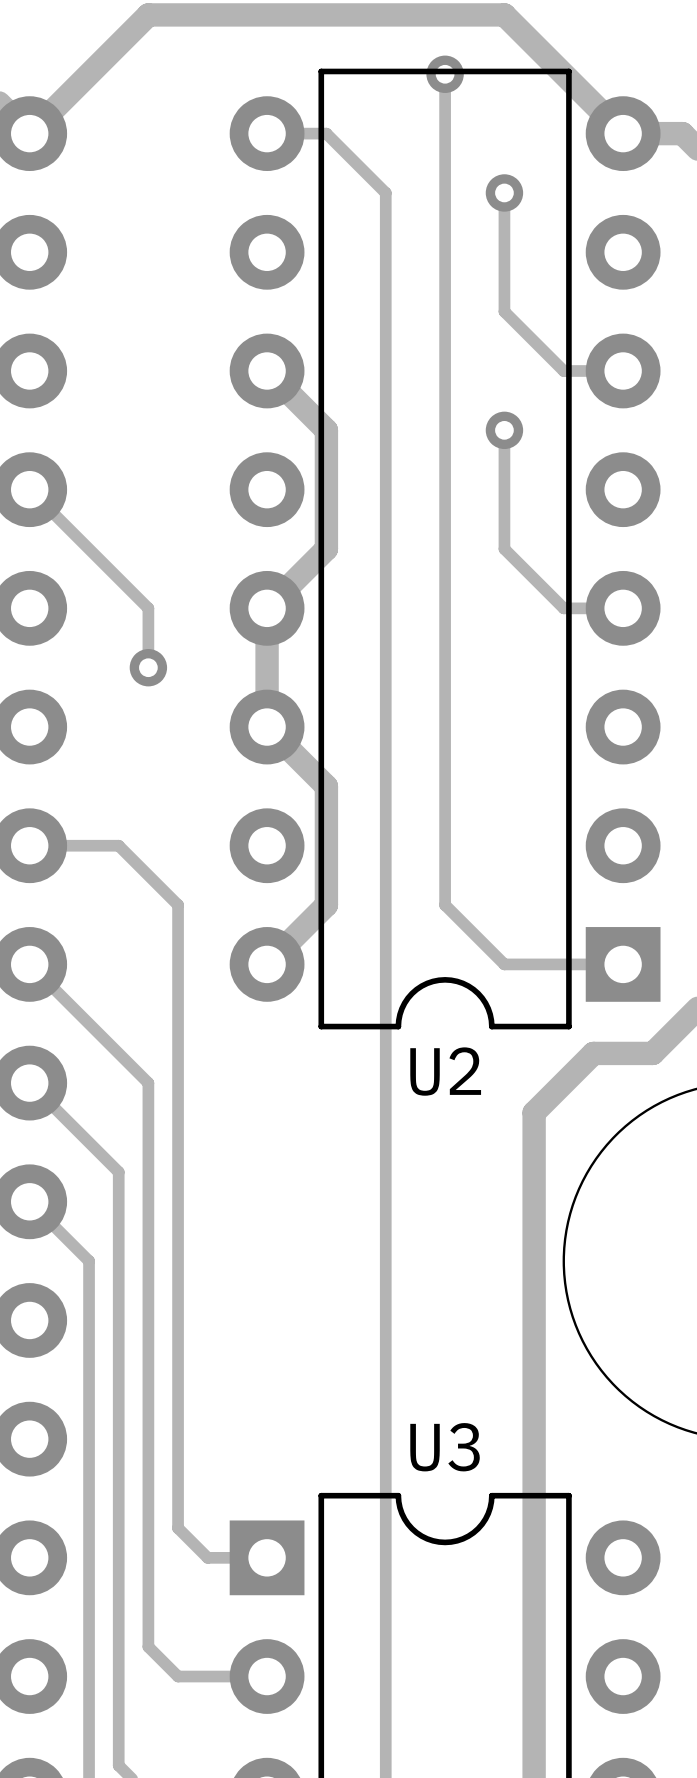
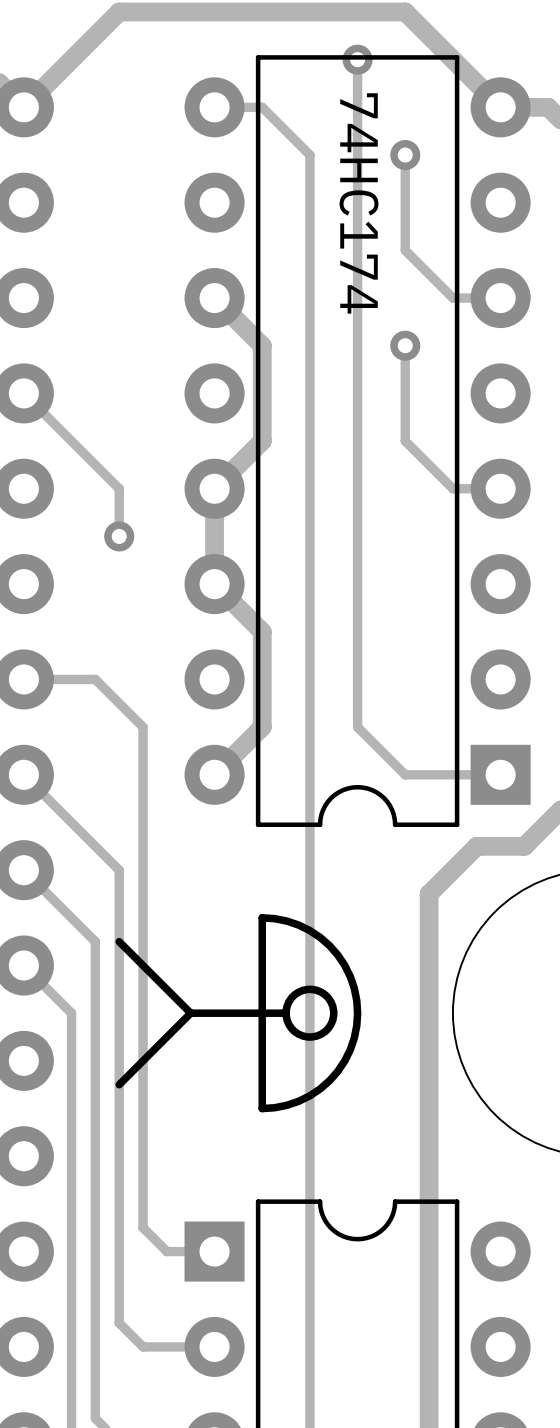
U2 value: none -> 74HC174 (359, 203)
U2 name: U2 (445, 1071) -> none
line: none -> (262, 917) (262, 1108) (274, 1107) (298, 1101) (320, 1088) (329, 1080) (337, 1071) (350, 1049) (356, 1025) (357, 1013) (356, 1000) (350, 976) (337, 955) (329, 945) (320, 937) (298, 925) (274, 918) (262, 917)
line: none -> (119, 941) (190, 1013)
drawing: none -> [282, 985, 338, 1041]
line: none -> (190, 1013) (119, 1084)
line: none -> (190, 1013) (286, 1013)
U3 name: U3 (445, 1447) -> none

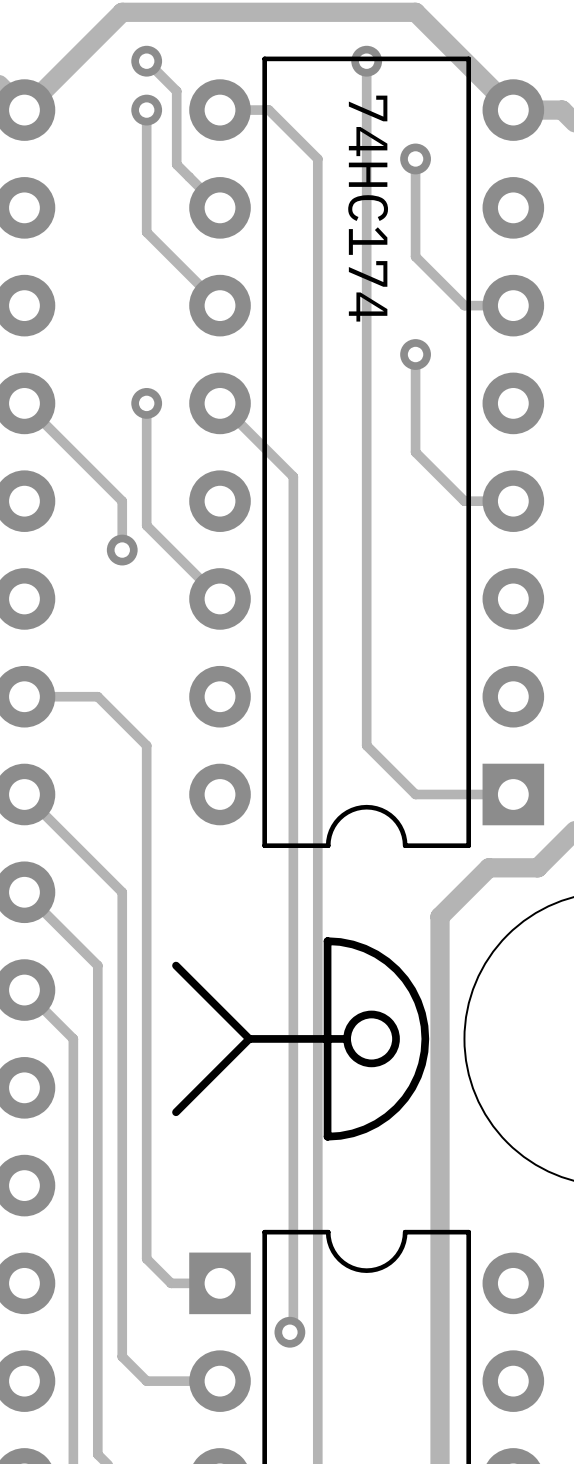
track: none -> (146, 61) (176, 91) (176, 164) (220, 207)
via: none -> (146, 61)
via: none -> (146, 110)
track: (214, 298) (262, 345) (262, 441) (214, 488) (214, 584) (262, 631) (262, 727) (214, 774) -> (220, 305) (146, 232) (146, 110)
track: none -> (146, 403) (146, 525) (220, 598)
via: none -> (146, 403)
track: none -> (220, 403) (293, 476) (293, 1328) (289, 1332)
line: (262, 917) (262, 1108) (274, 1107) (298, 1101) (320, 1088) (329, 1080) (337, 1071) (350, 1049) (356, 1025) (357, 1013) (356, 1000) (350, 976) (337, 955) (329, 945) (320, 937) (298, 925) (274, 918) (262, 917) -> (327, 941) (327, 1136) (340, 1135) (364, 1129) (387, 1116) (396, 1108) (405, 1098) (417, 1076) (424, 1051) (425, 1038) (424, 1026) (417, 1001) (405, 979) (396, 969) (387, 961) (364, 948) (340, 941) (327, 941)
line: (119, 941) (190, 1013) -> none
line: none -> (176, 965) (249, 1038) (176, 1112)
drawing: [282, 985, 338, 1041] -> none
drawing: none -> [343, 1010, 400, 1068]
line: (190, 1013) (243, 1013) -> (293, 1038) (347, 1038)
line: (190, 1013) (119, 1084) -> none
via: none -> (289, 1332)

